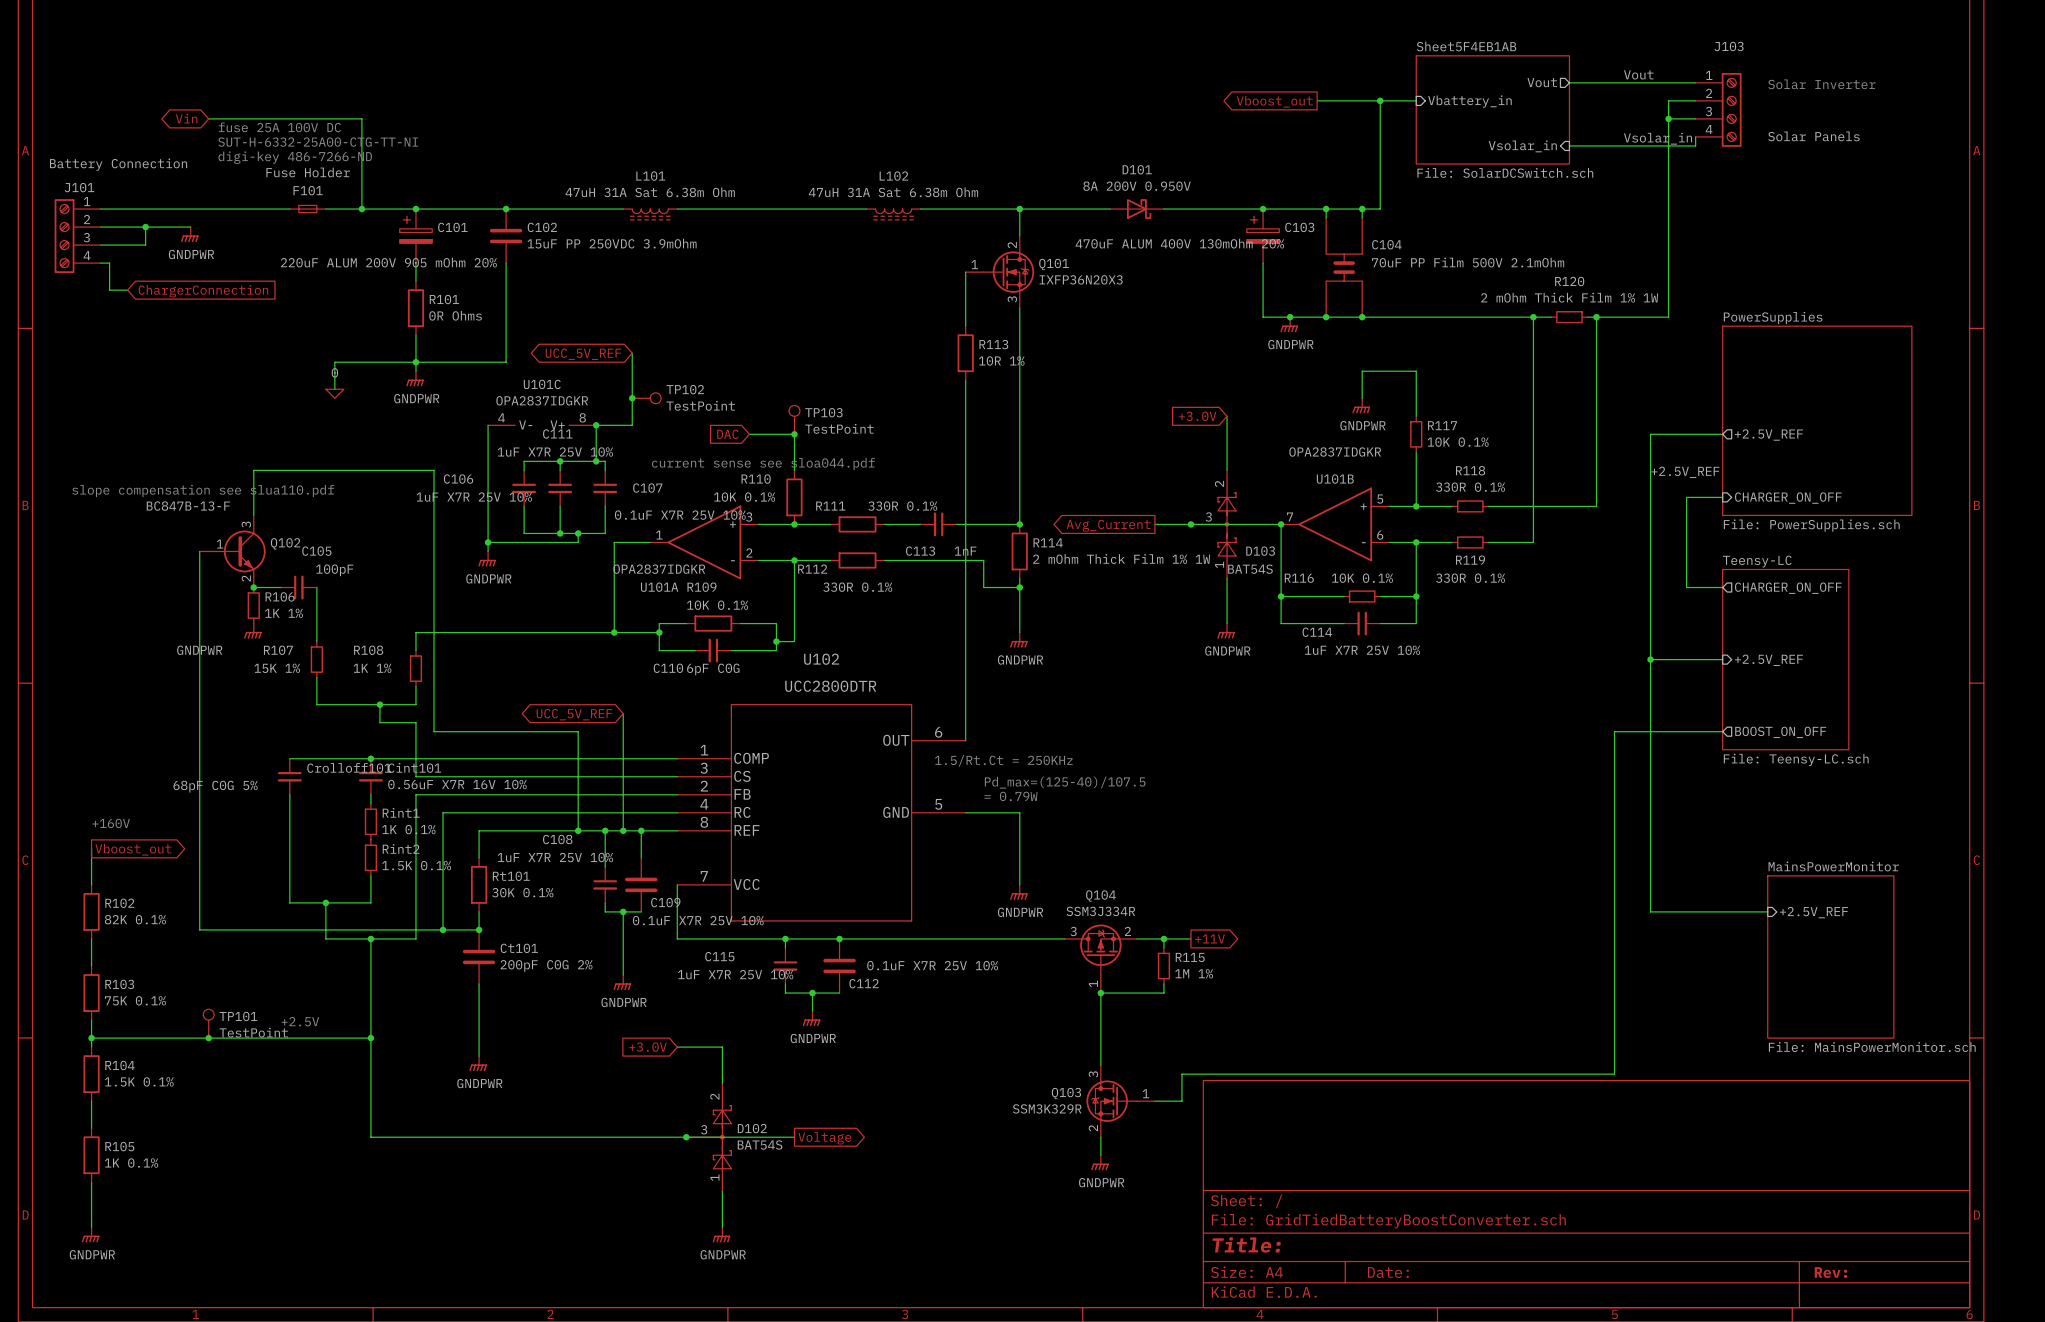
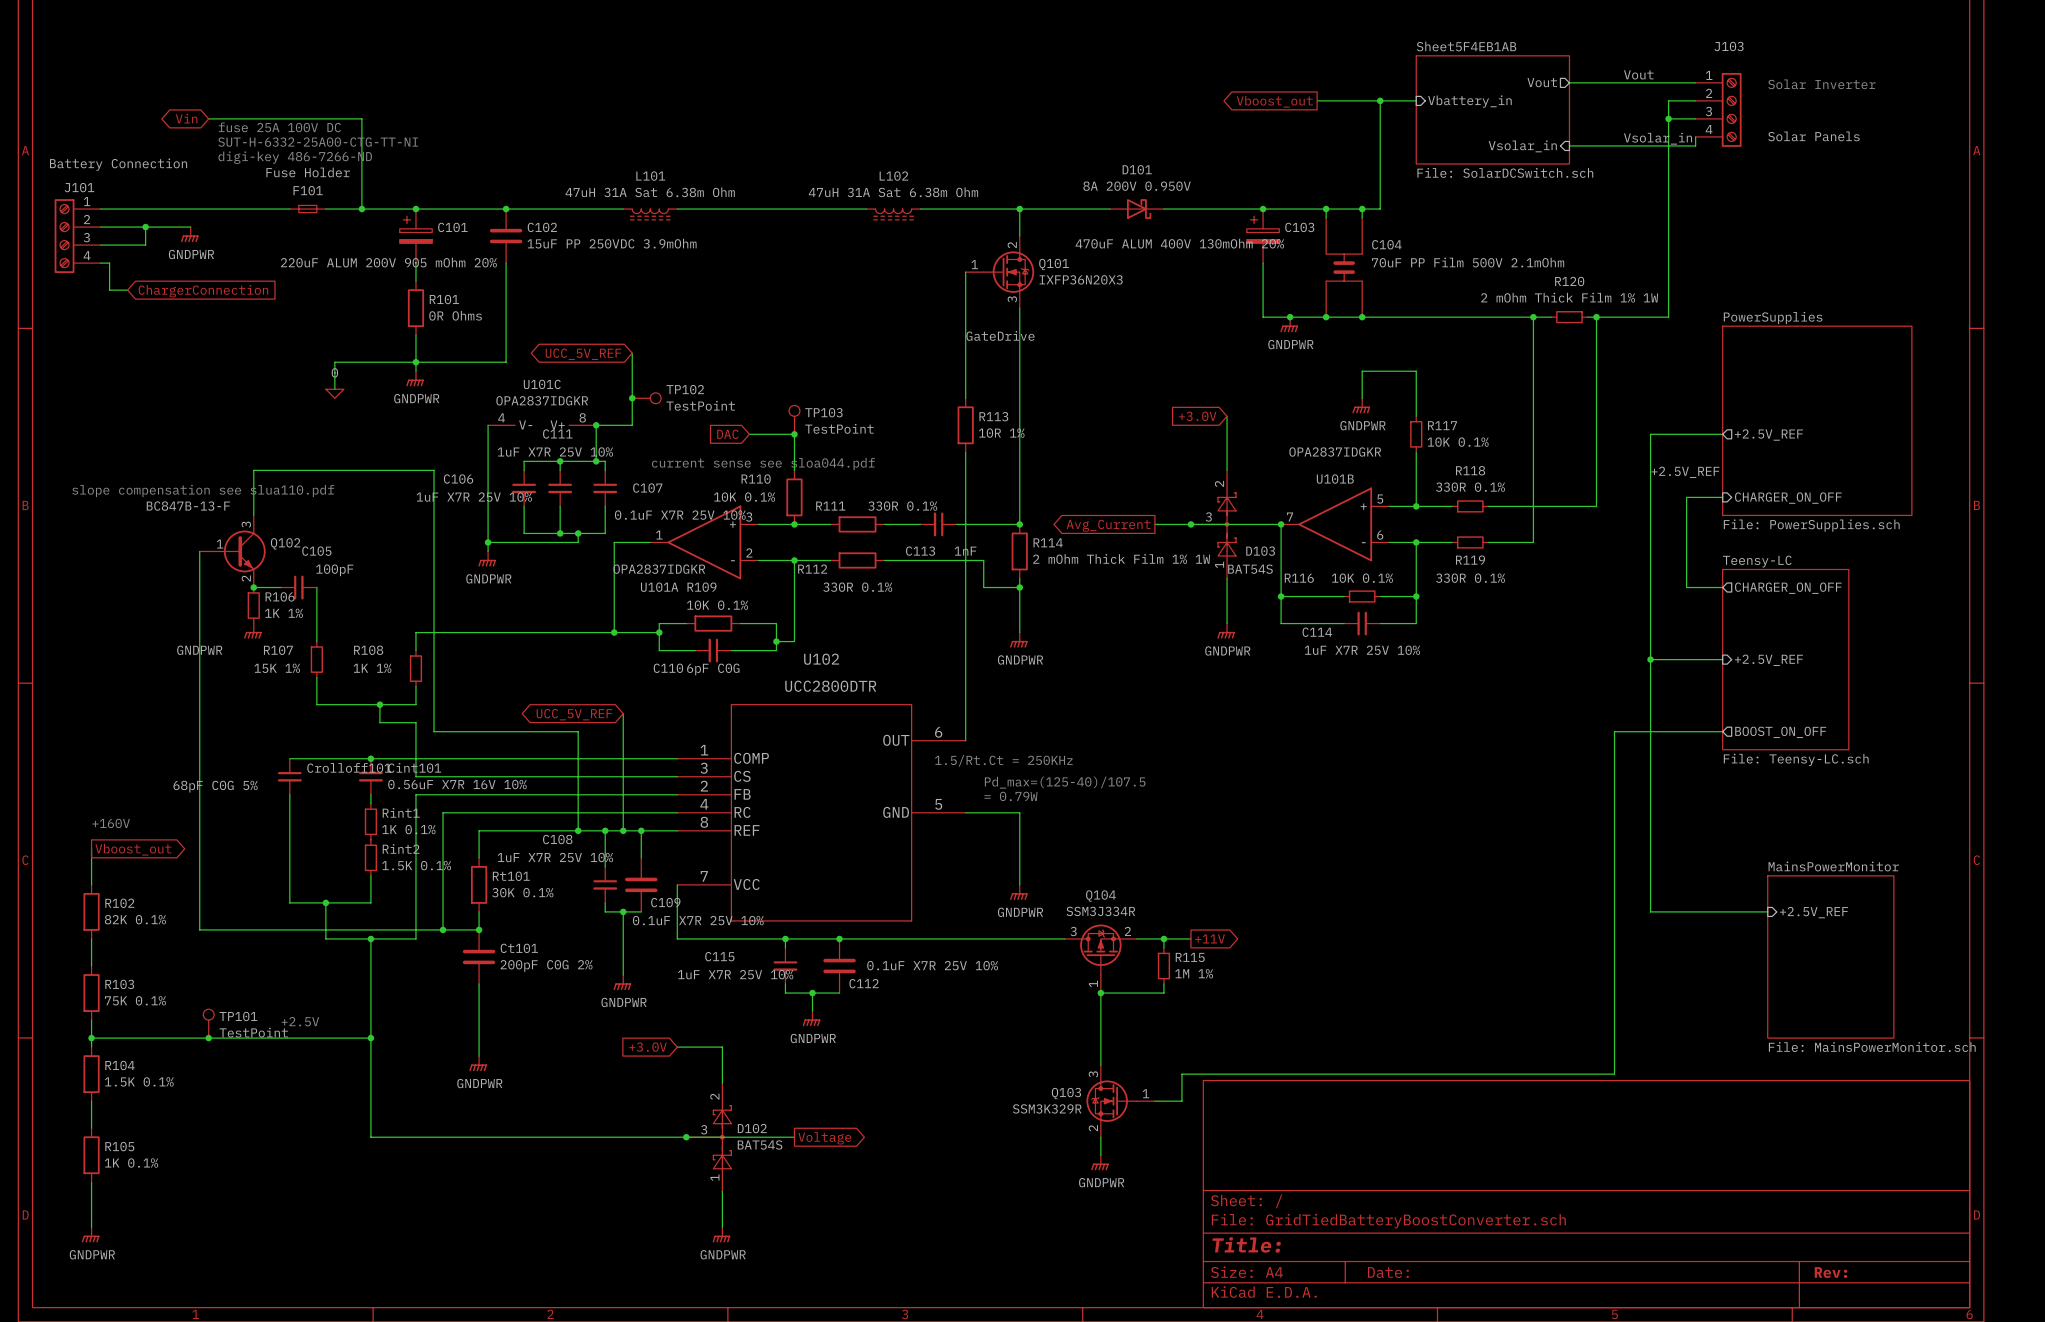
label: none -> GateDrive (1000, 335)
R113 position: (965, 353) -> (965, 425)
wire: (965, 398) (965, 452) -> (965, 326) (965, 380)

